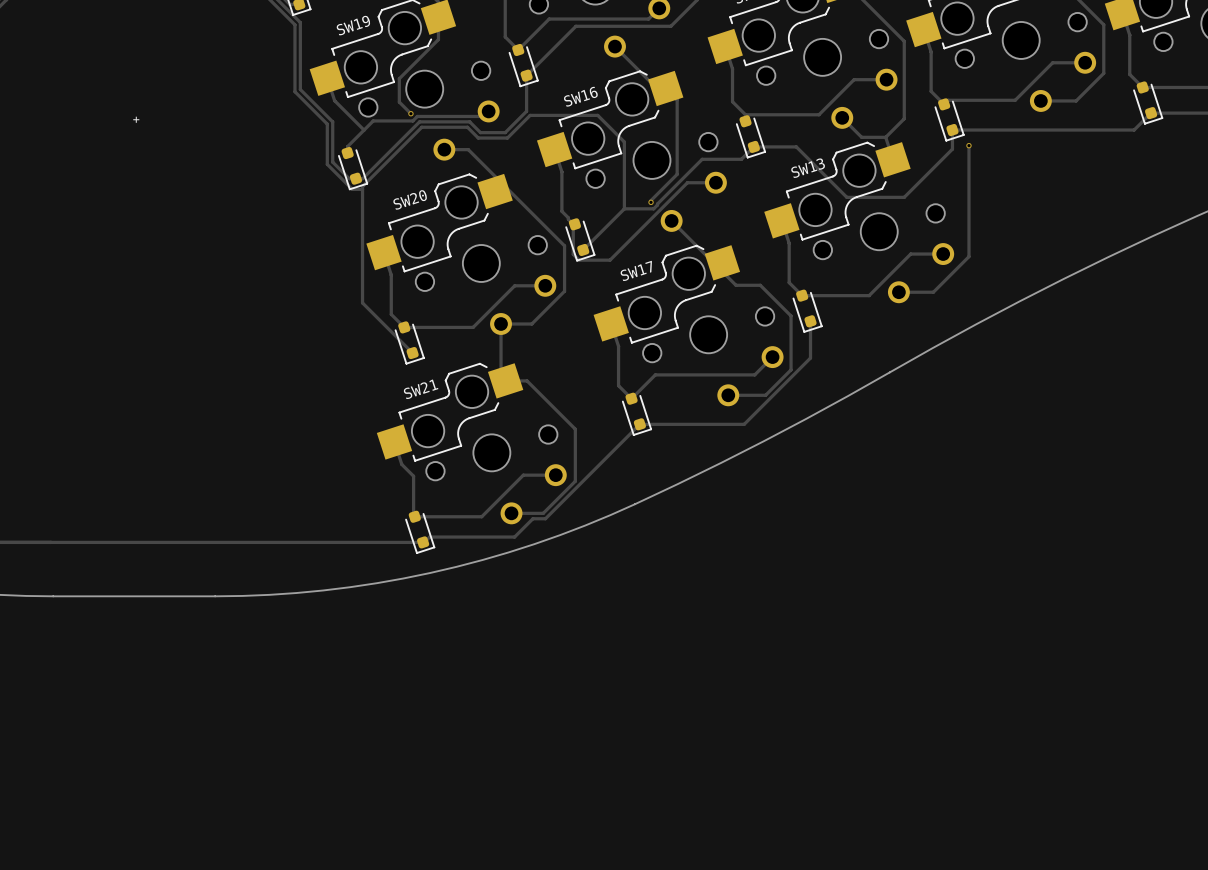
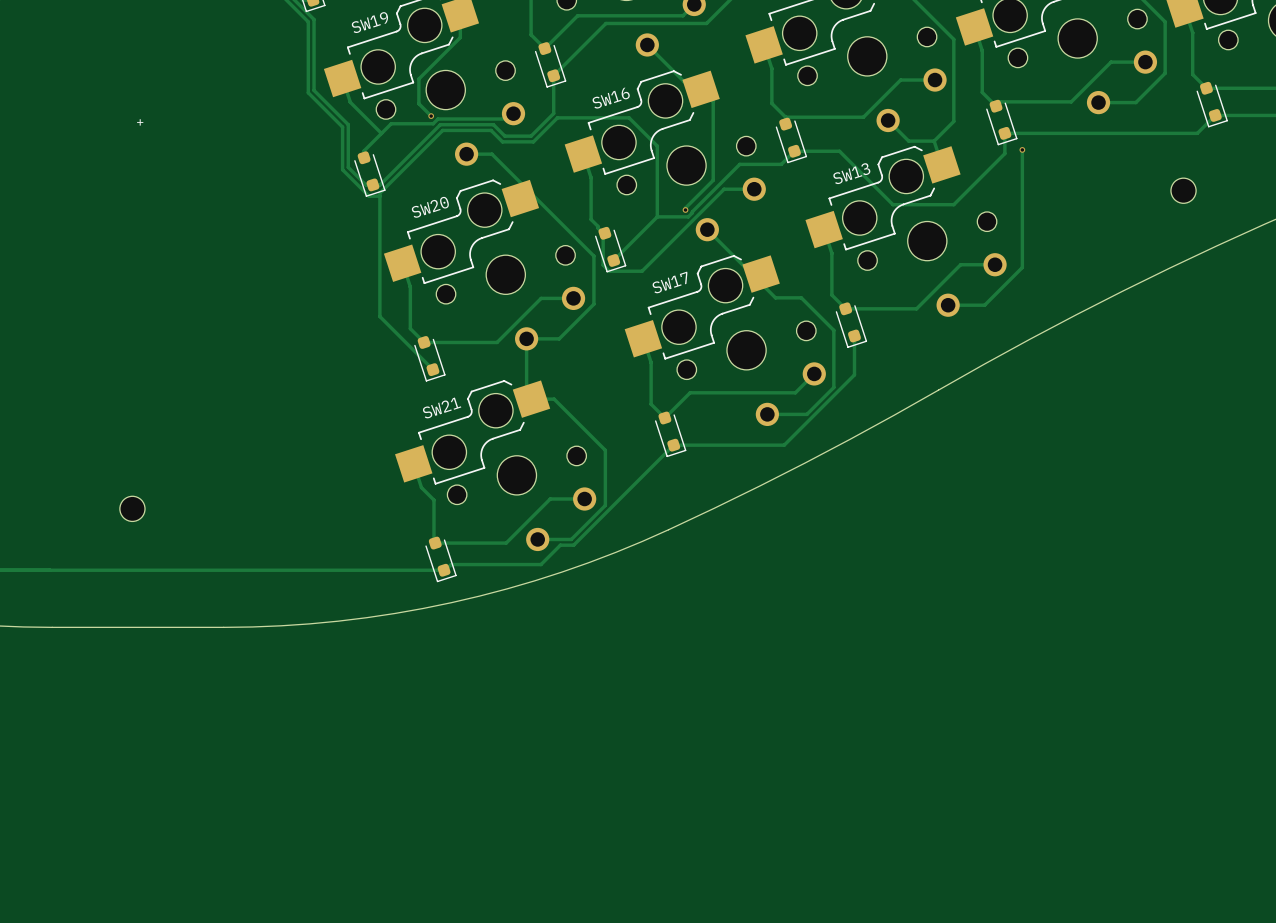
part: none -> (1183, 190)
part: none -> (132, 508)

